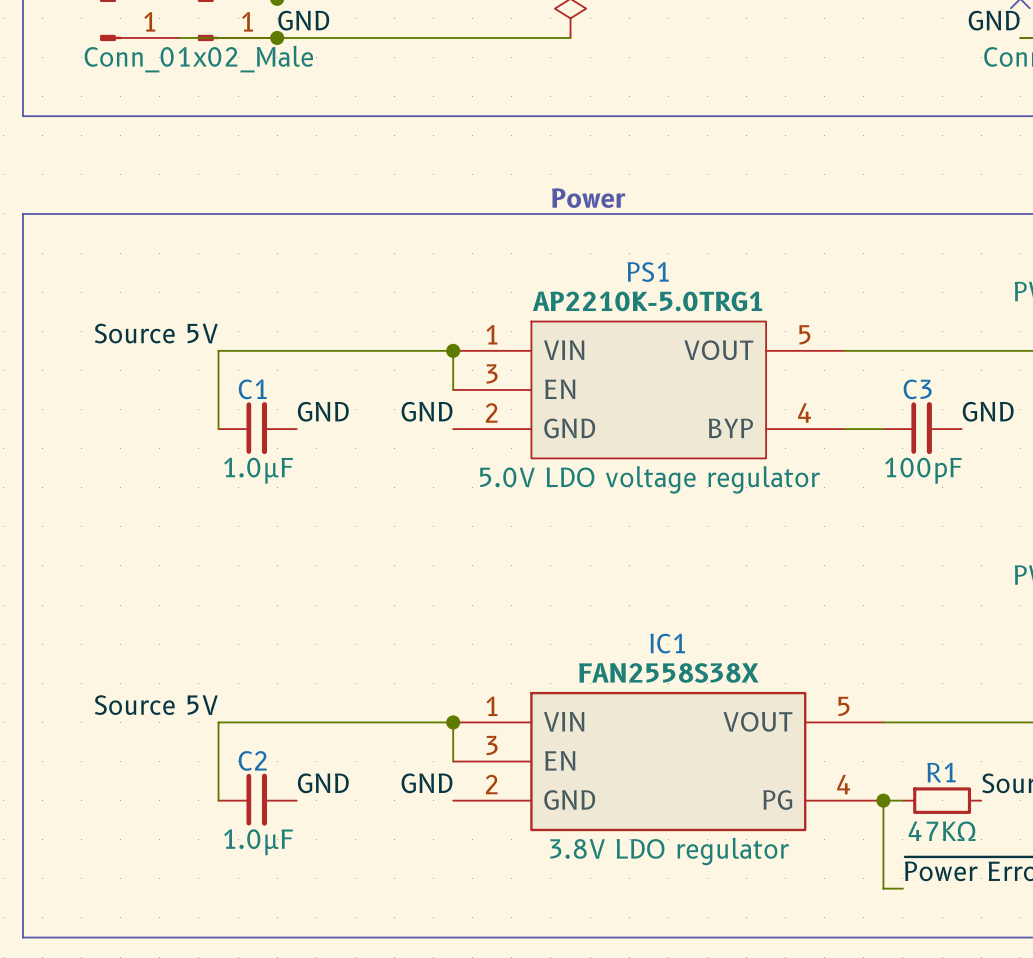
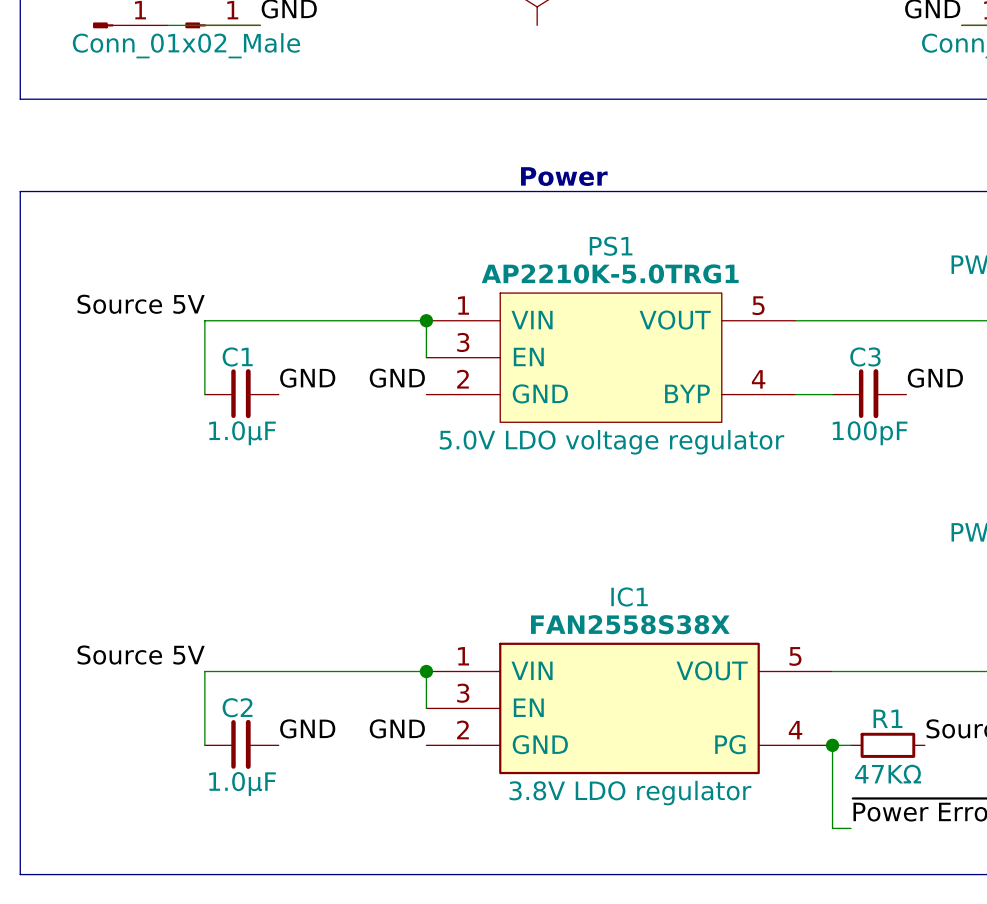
wire: (277, 37) (570, 37) -> none
junction: (277, 37) -> none

